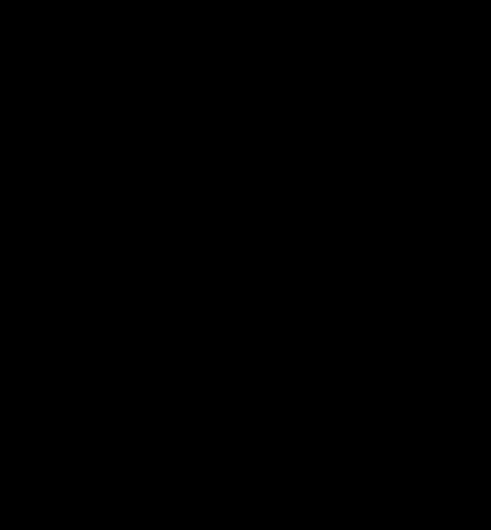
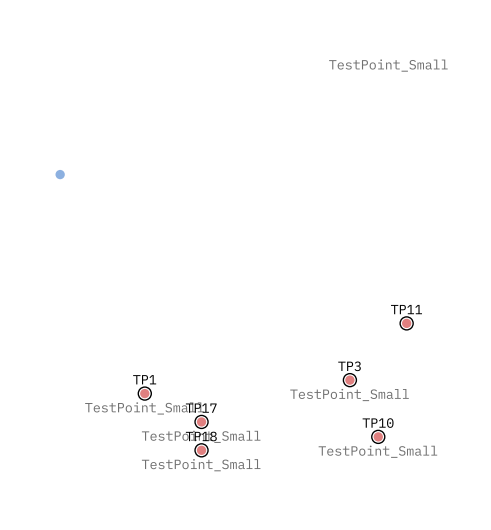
part: none -> (60, 174)
TP11: none -> TestPoint_Small (406, 323)
TP3: none -> TestPoint_Small (349, 380)
TP1: none -> TestPoint_Small (144, 393)
TP17: none -> TestPoint_Small (201, 421)
TP10: none -> TestPoint_Small (378, 436)
TP18: none -> TestPoint_Small (201, 450)

